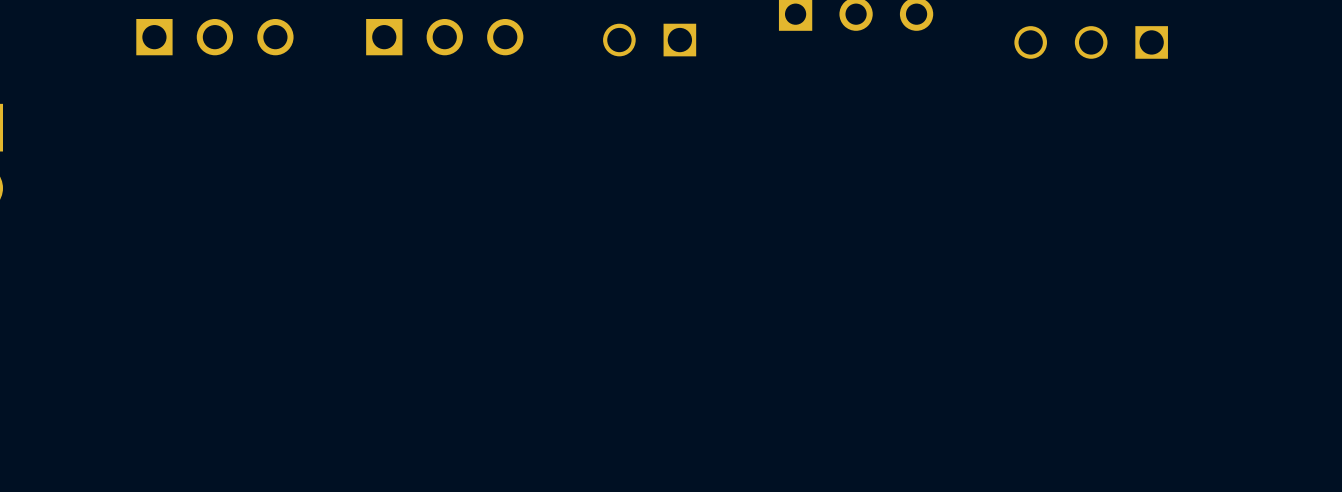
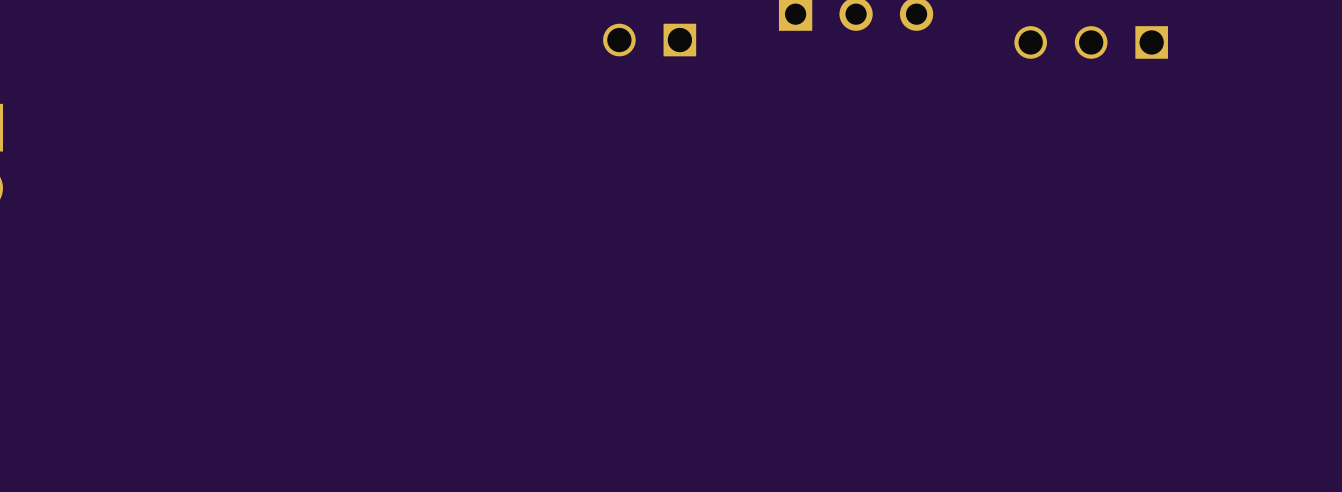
part: (214, 37) -> none
part: (444, 37) -> none

